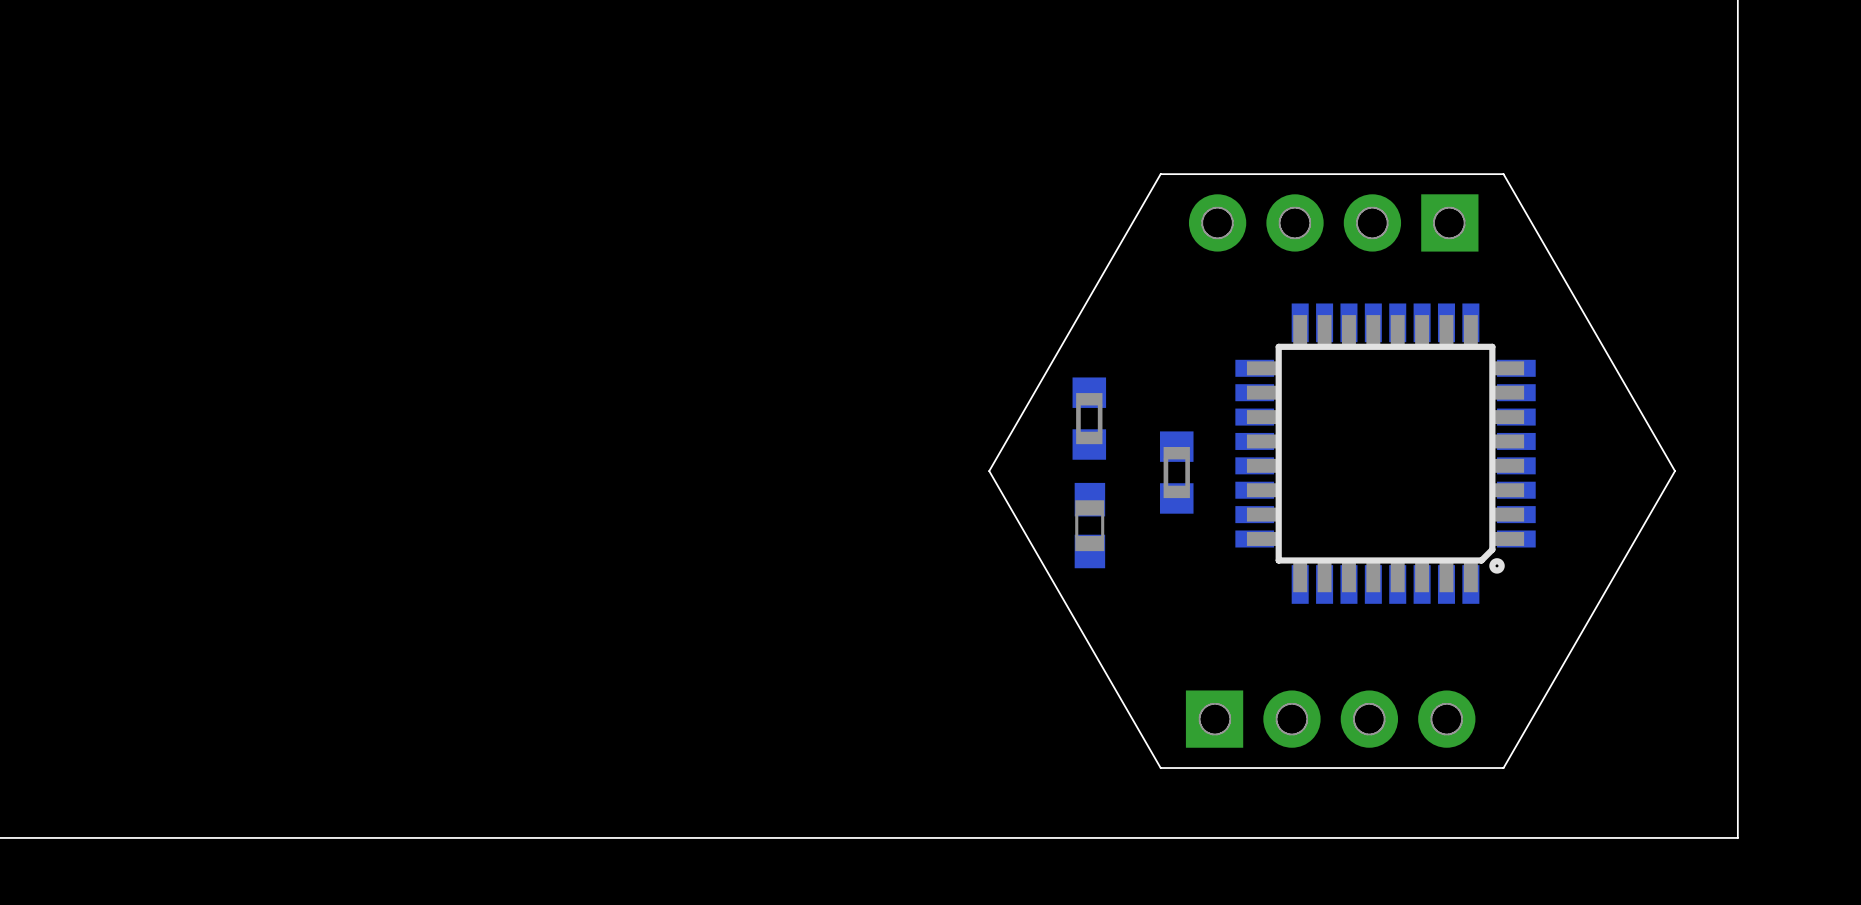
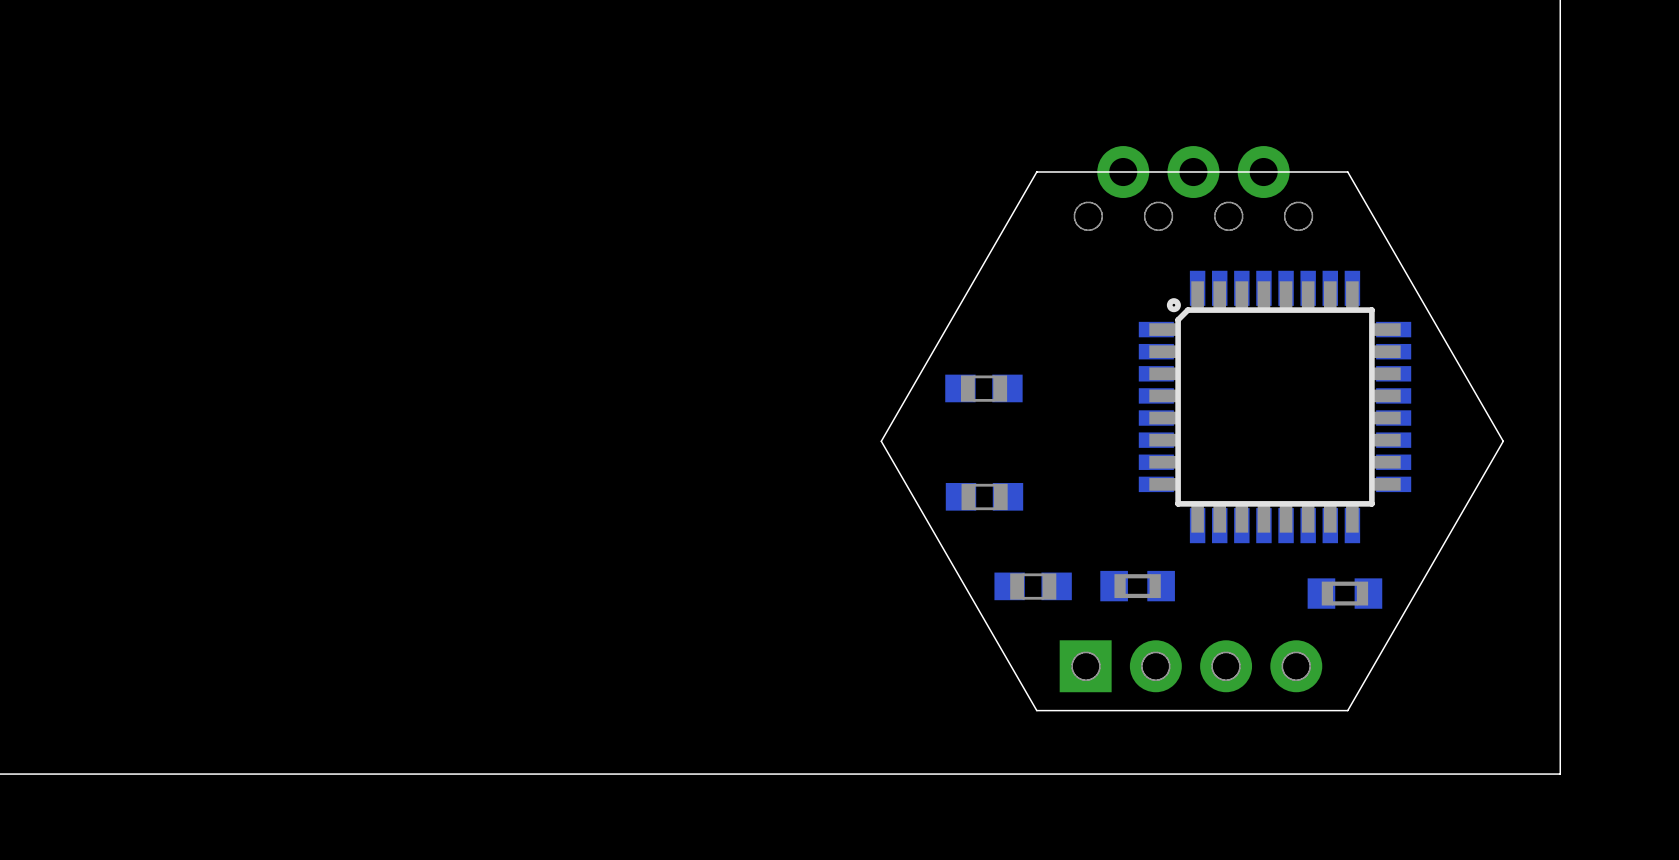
part: none -> (1193, 172)
part: (1333, 222) -> none
part footprint: [1072, 377, 1107, 460] -> [945, 374, 1023, 403]
part rotation: 0° (1385, 453) -> 180° (1275, 406)
part: (1176, 472) -> none
part rotation: 0° (1089, 525) -> 90° clockwise (984, 496)
part: none -> (1137, 586)
part: none -> (1033, 586)
part: none -> (1344, 593)

